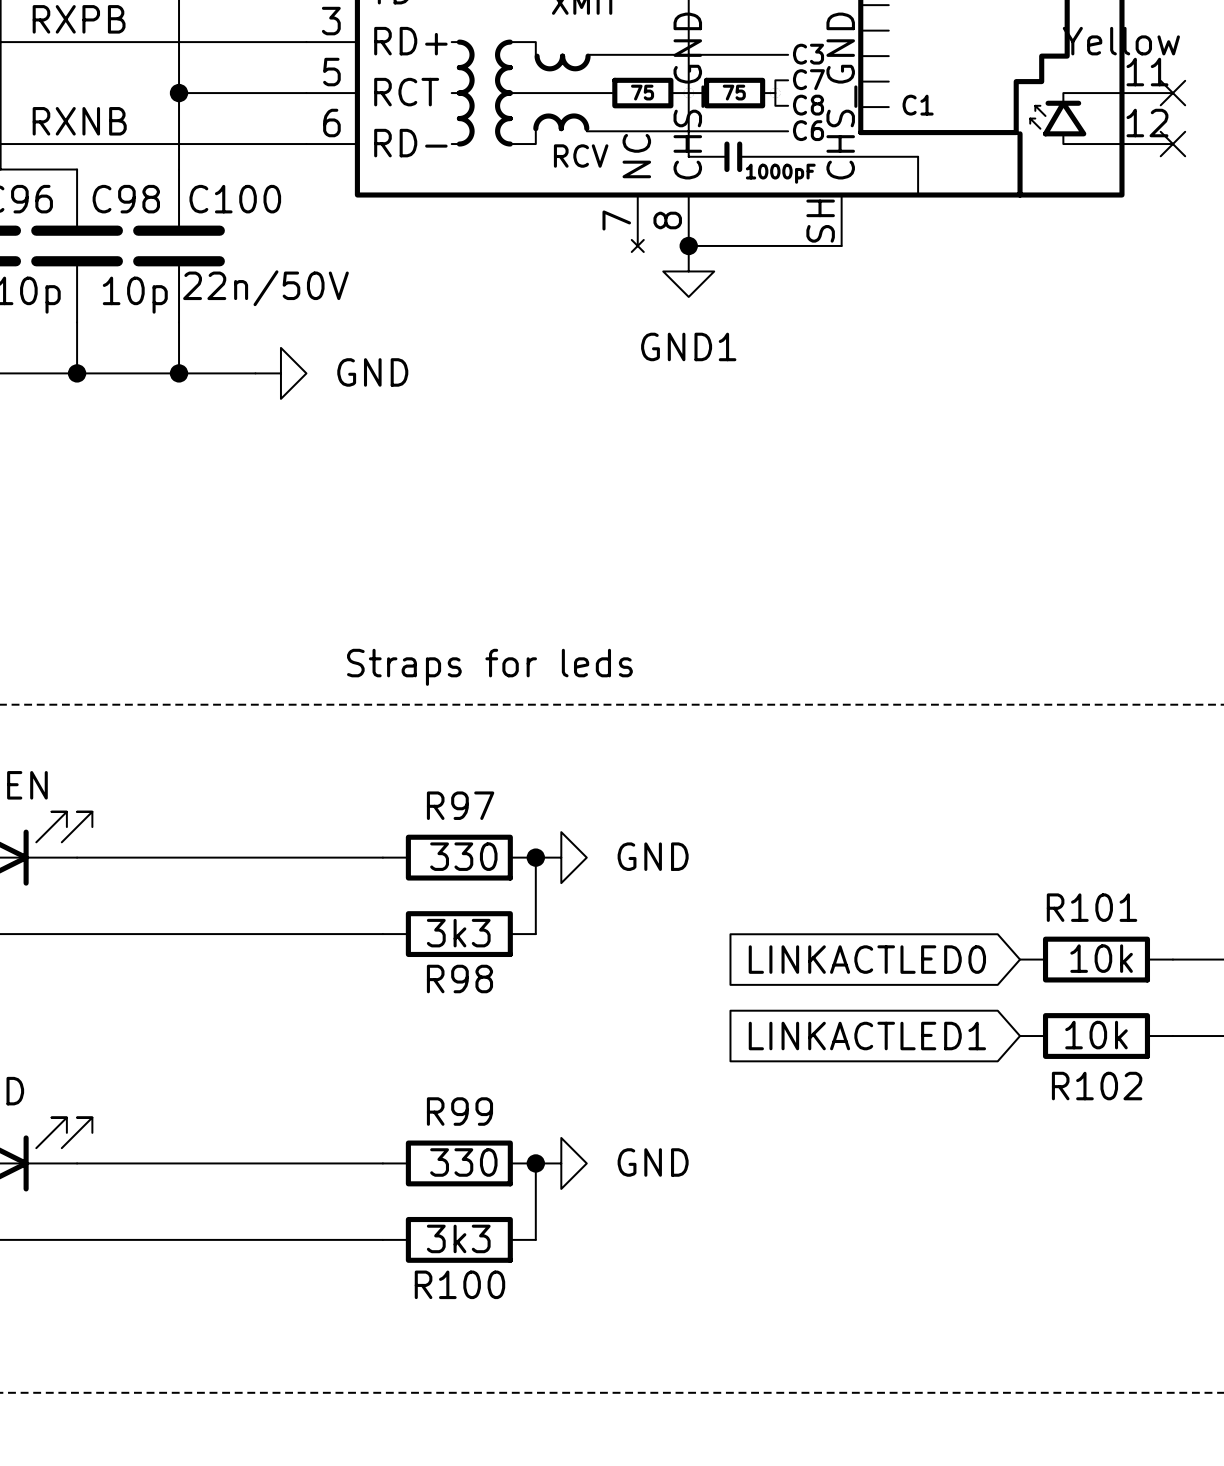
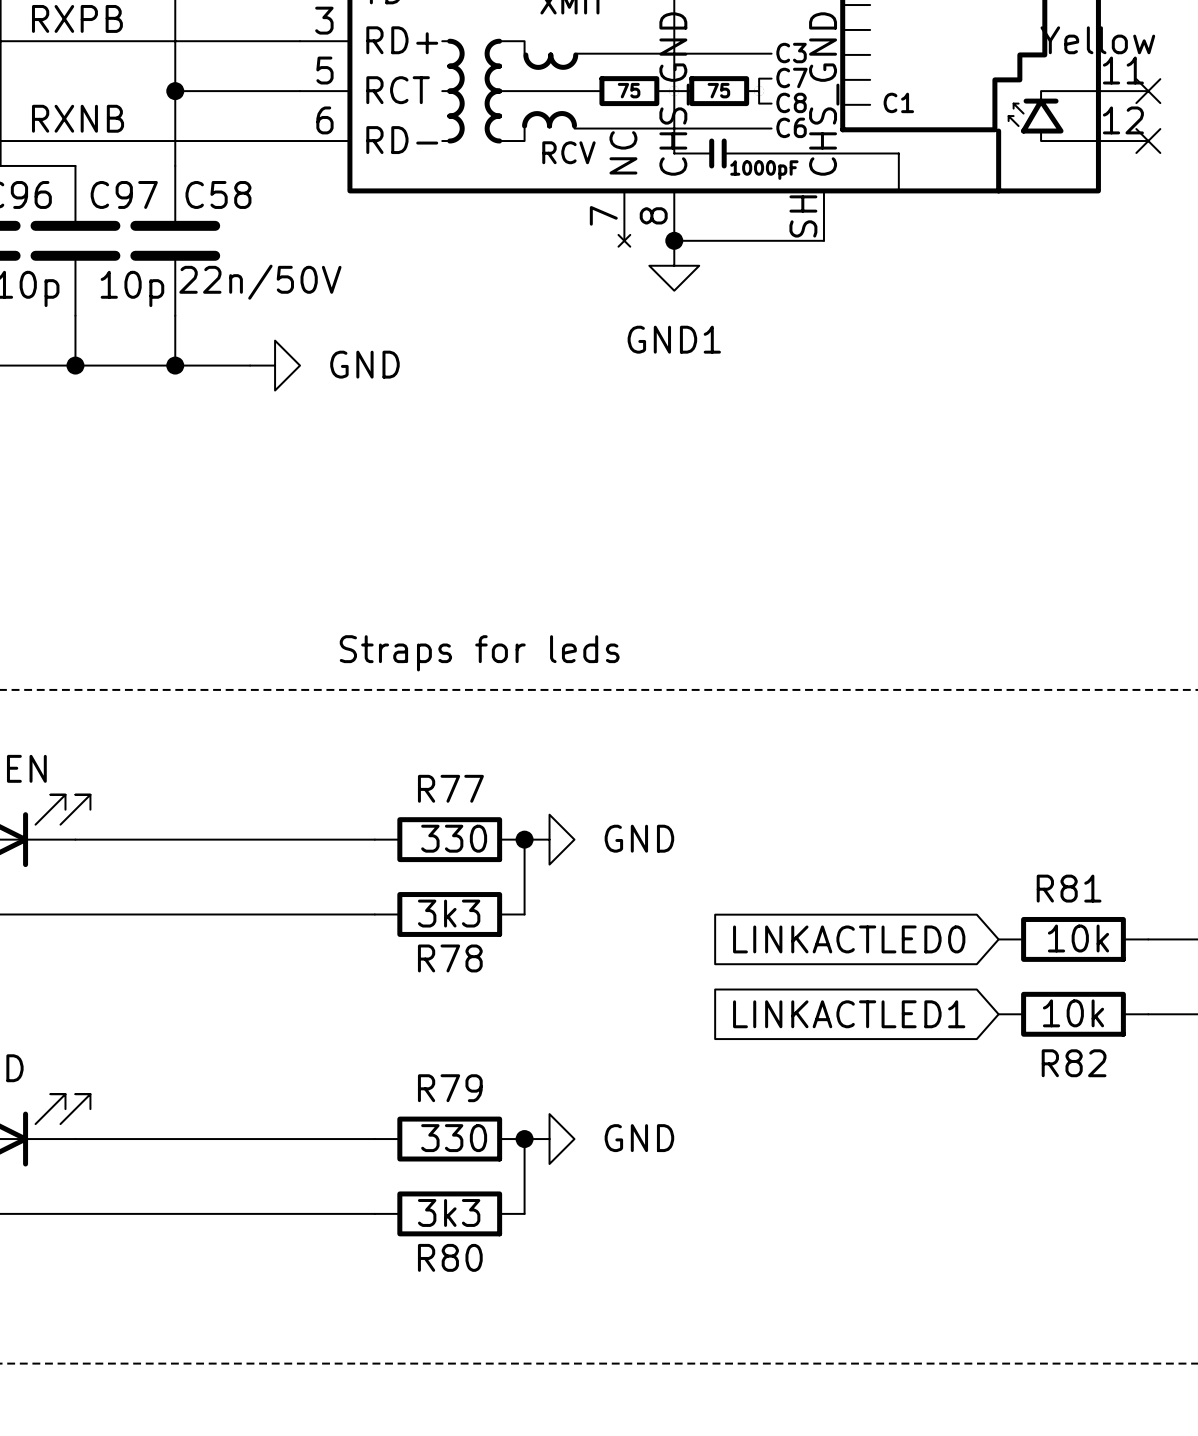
C98 name: C98 (126, 199) -> C97 (124, 194)
C100 name: C100 (235, 199) -> C58 (218, 194)
R97 name: R97 (460, 805) -> R77 (450, 788)
R101 name: R101 (1092, 907) -> R81 (1069, 888)
R98 name: R98 (459, 979) -> R78 (450, 958)
R102 name: R102 (1097, 1086) -> R82 (1074, 1063)
R99 name: R99 (459, 1111) -> R79 (450, 1088)
R100 name: R100 (459, 1284) -> R80 (450, 1257)

